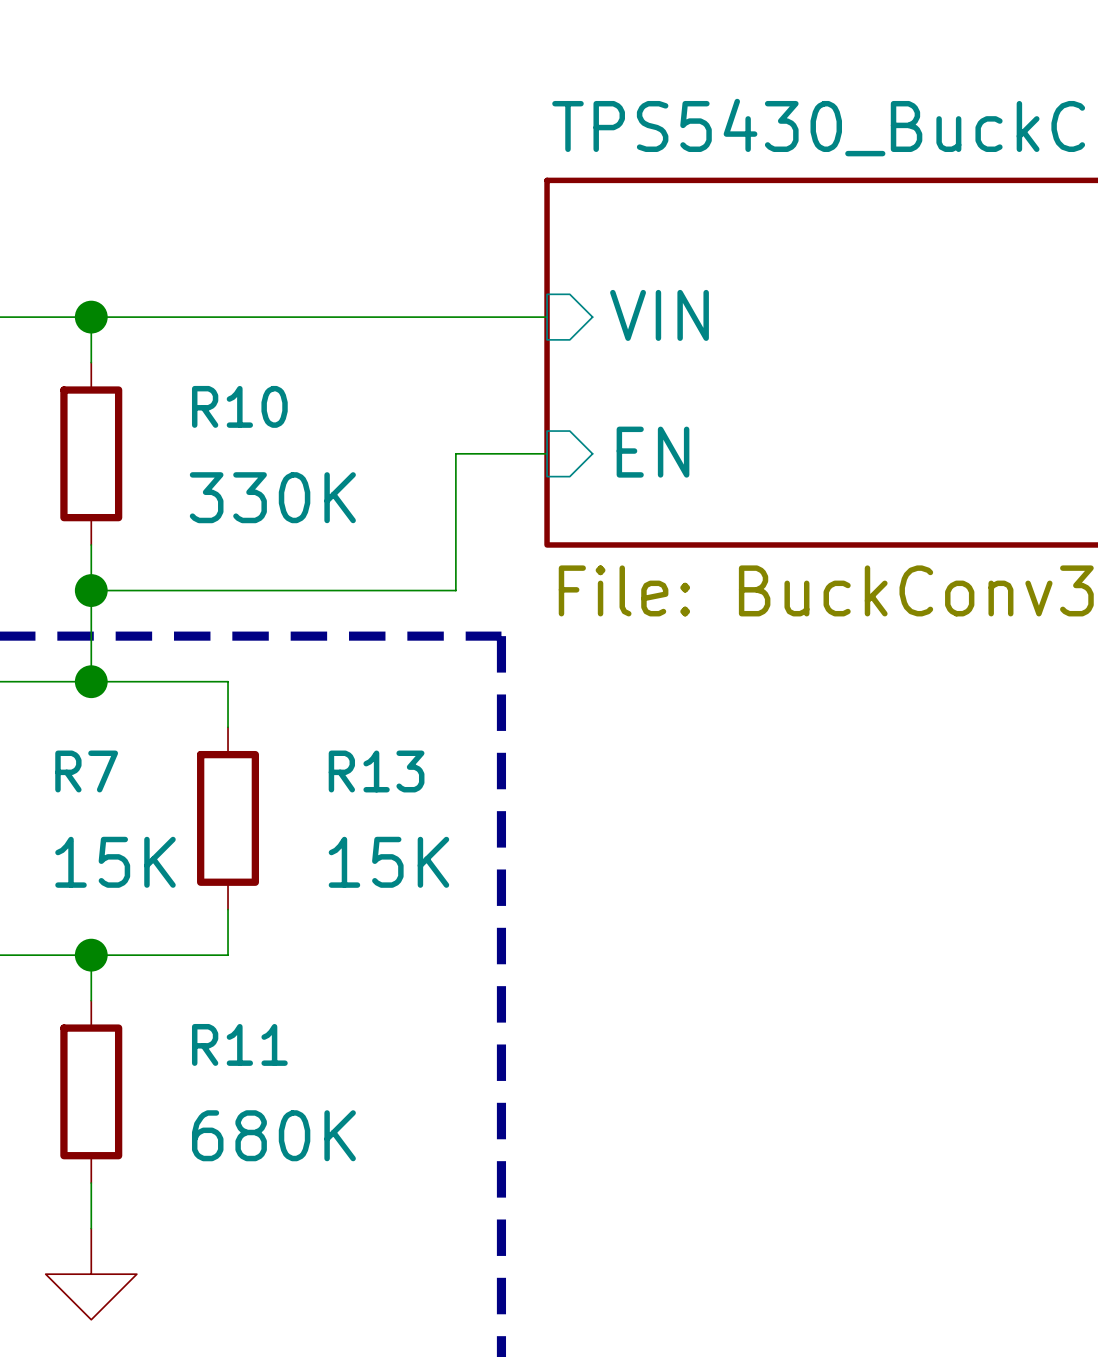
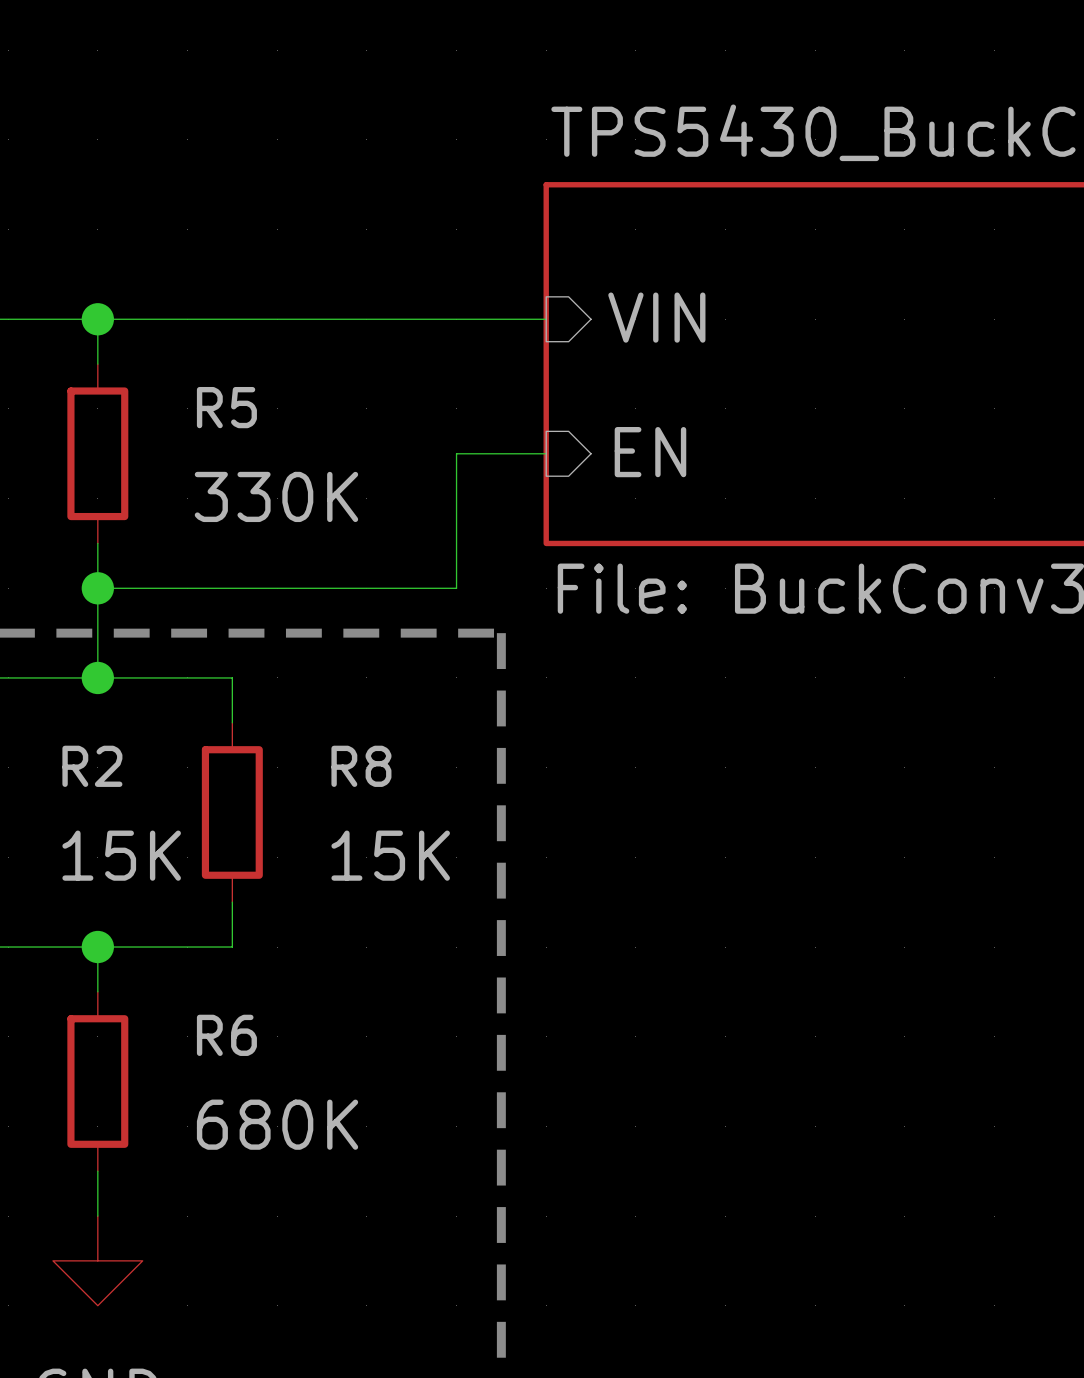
R10 name: R10 (239, 406) -> R5 (226, 407)
R7 name: R7 (86, 771) -> R2 (92, 766)
R13 name: R13 (376, 771) -> R8 (361, 766)
R11 name: R11 (239, 1044) -> R6 (226, 1035)

